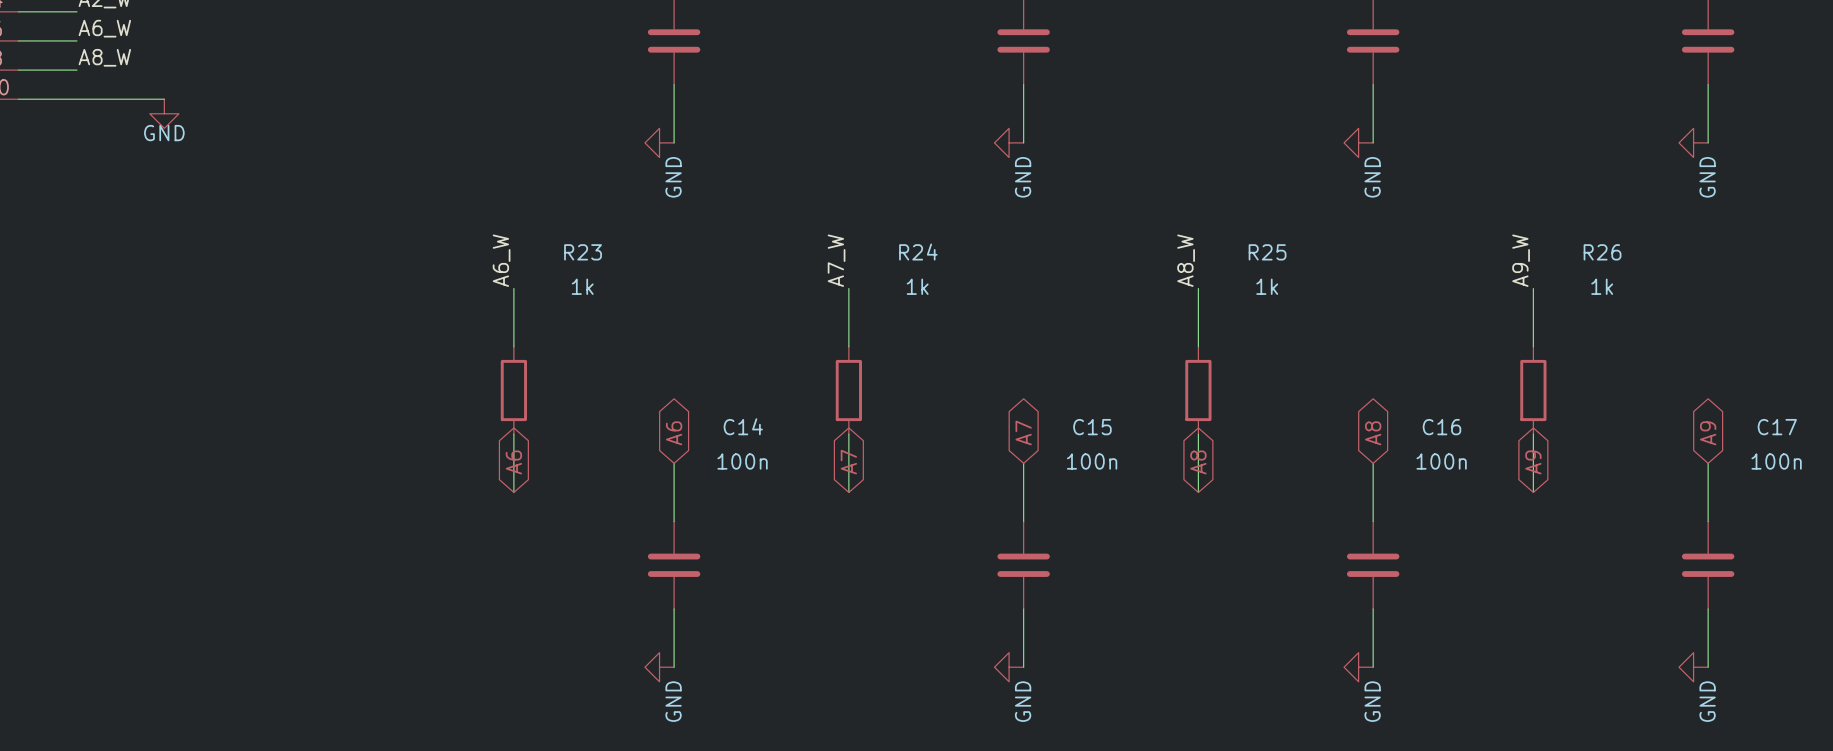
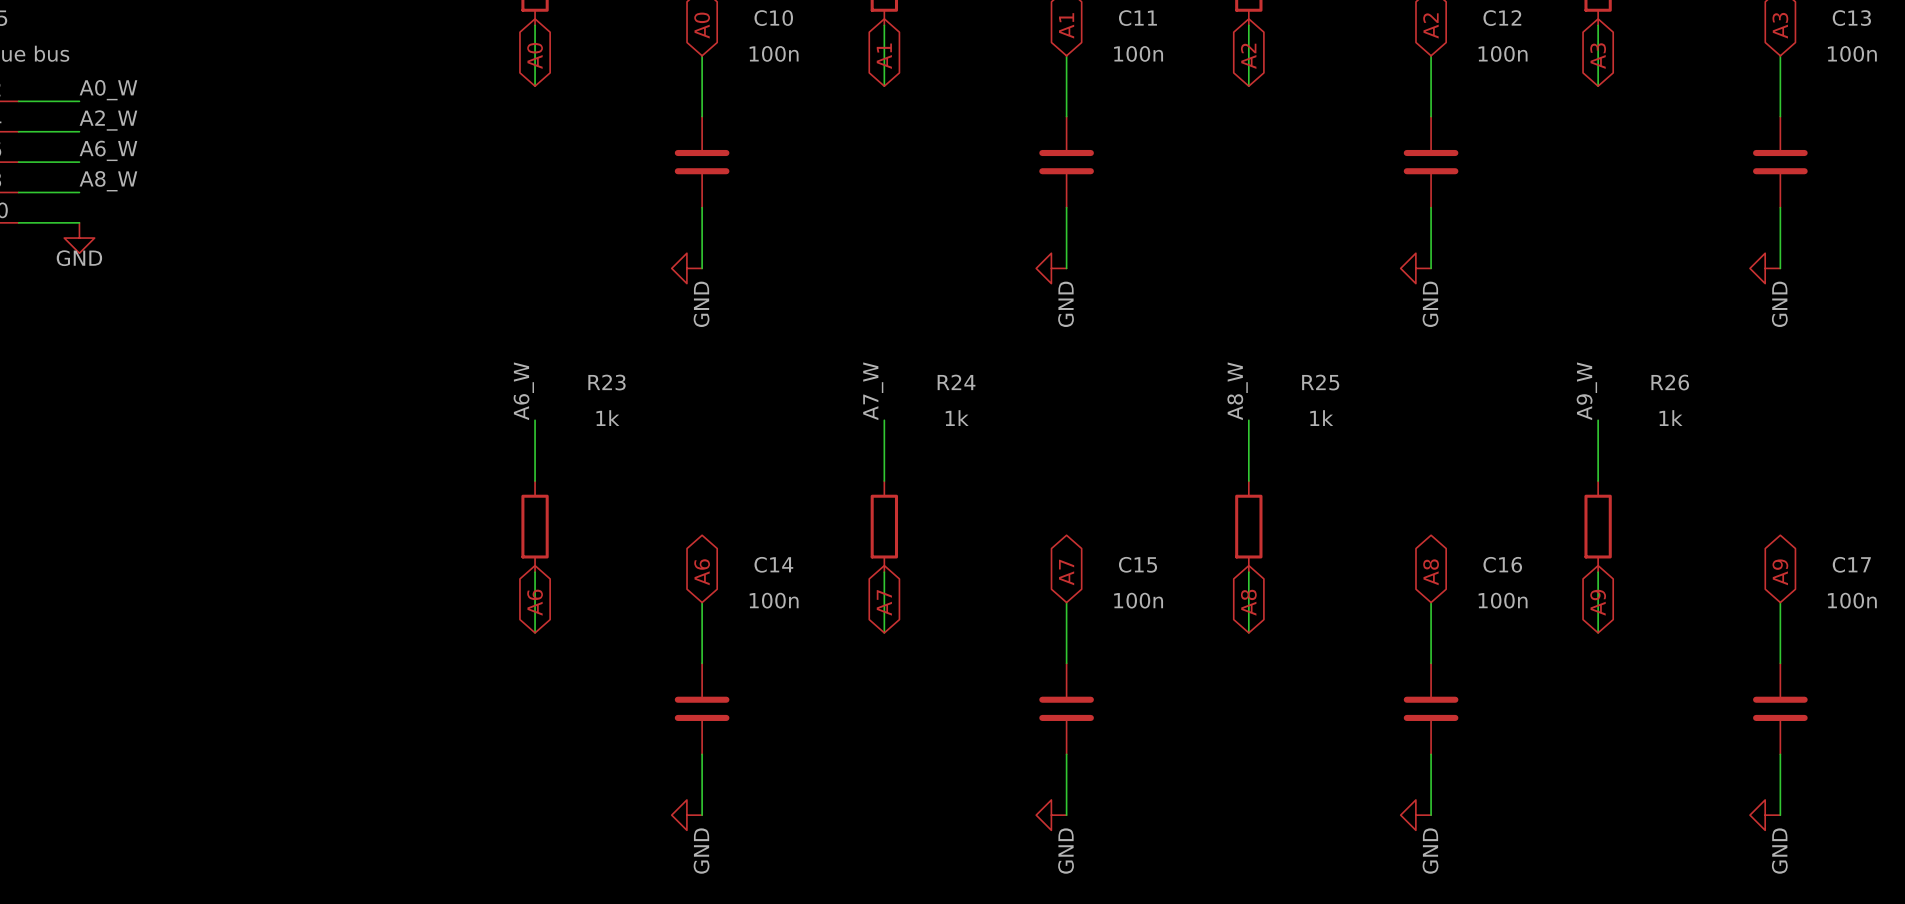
wire: (76, 99) (164, 99) -> none
power symbol position: GND (164, 113) -> GND (79, 238)

